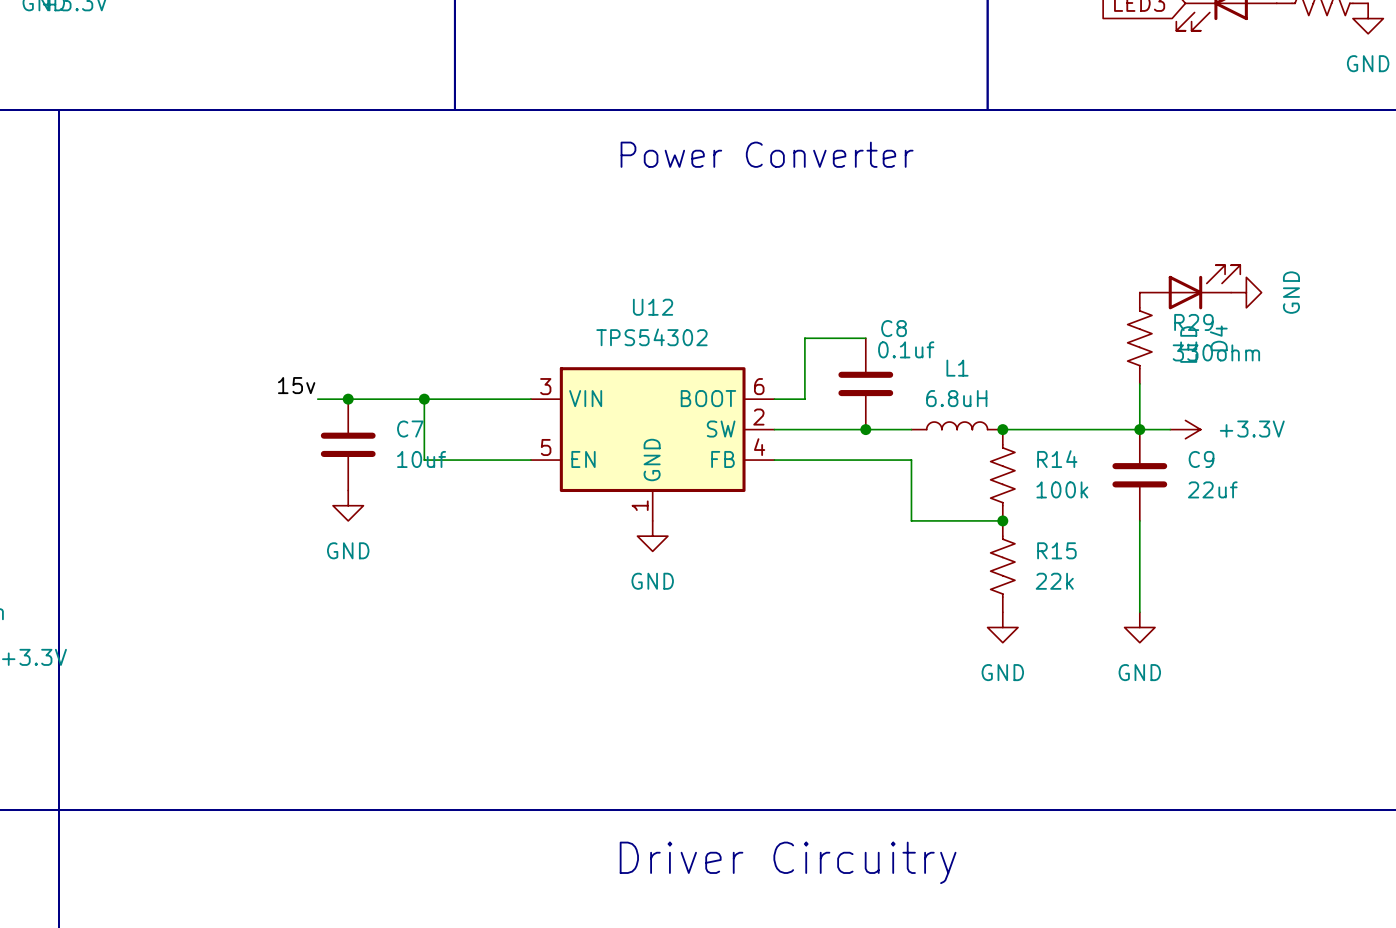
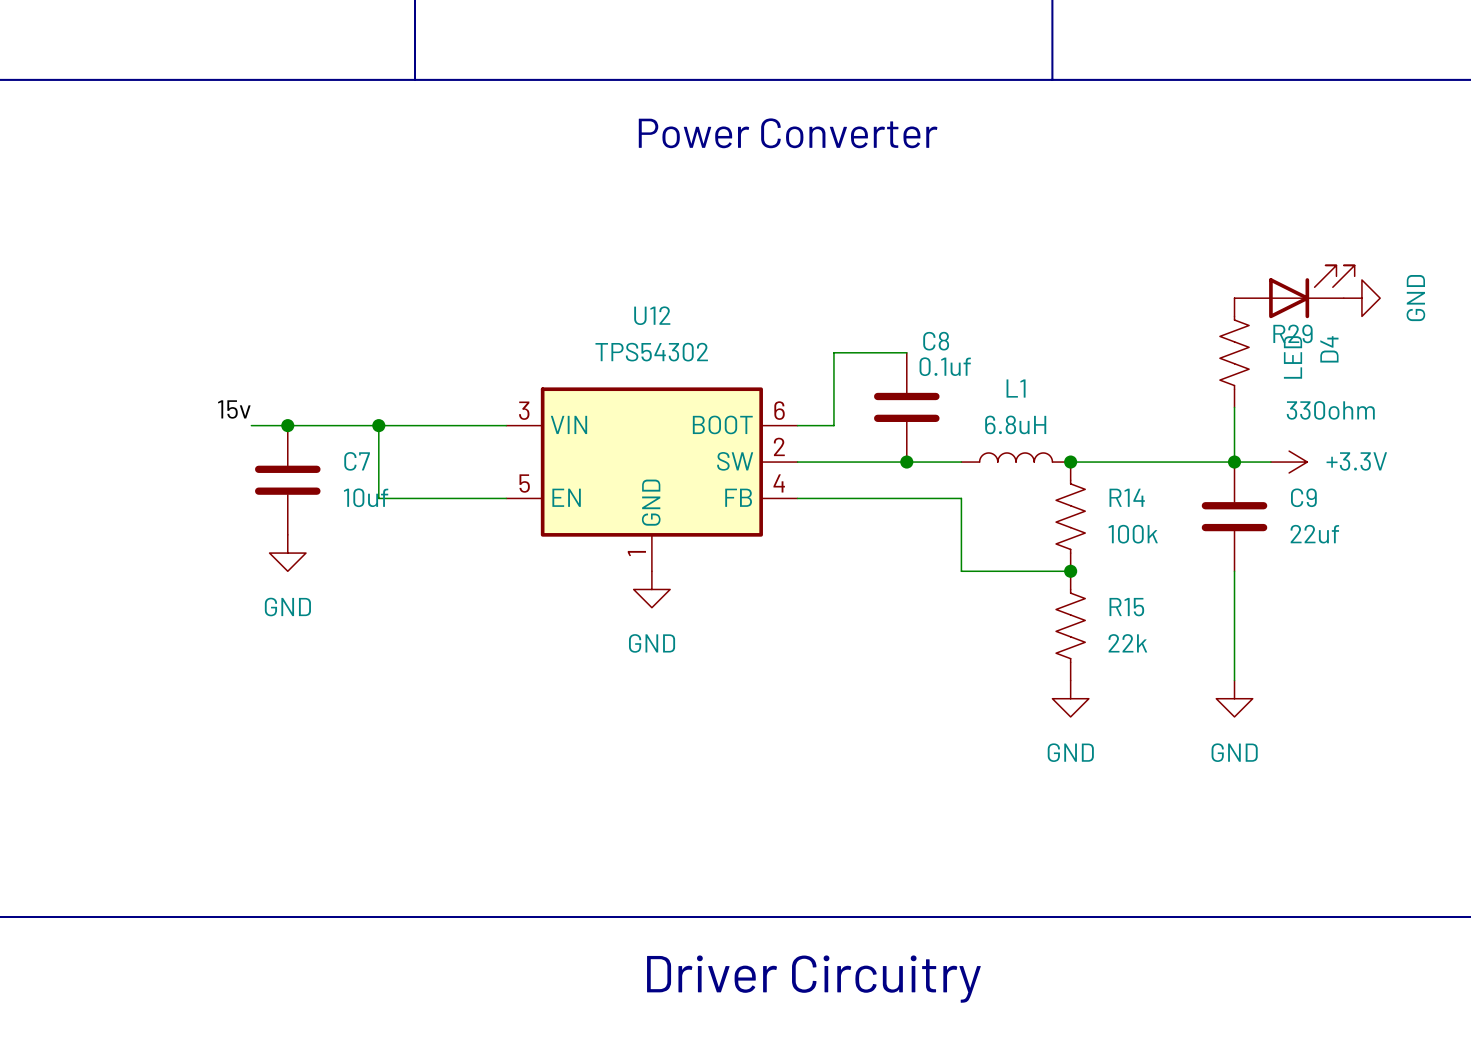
R29 value position: 330ohm (1216, 352) -> 330ohm (1330, 410)

